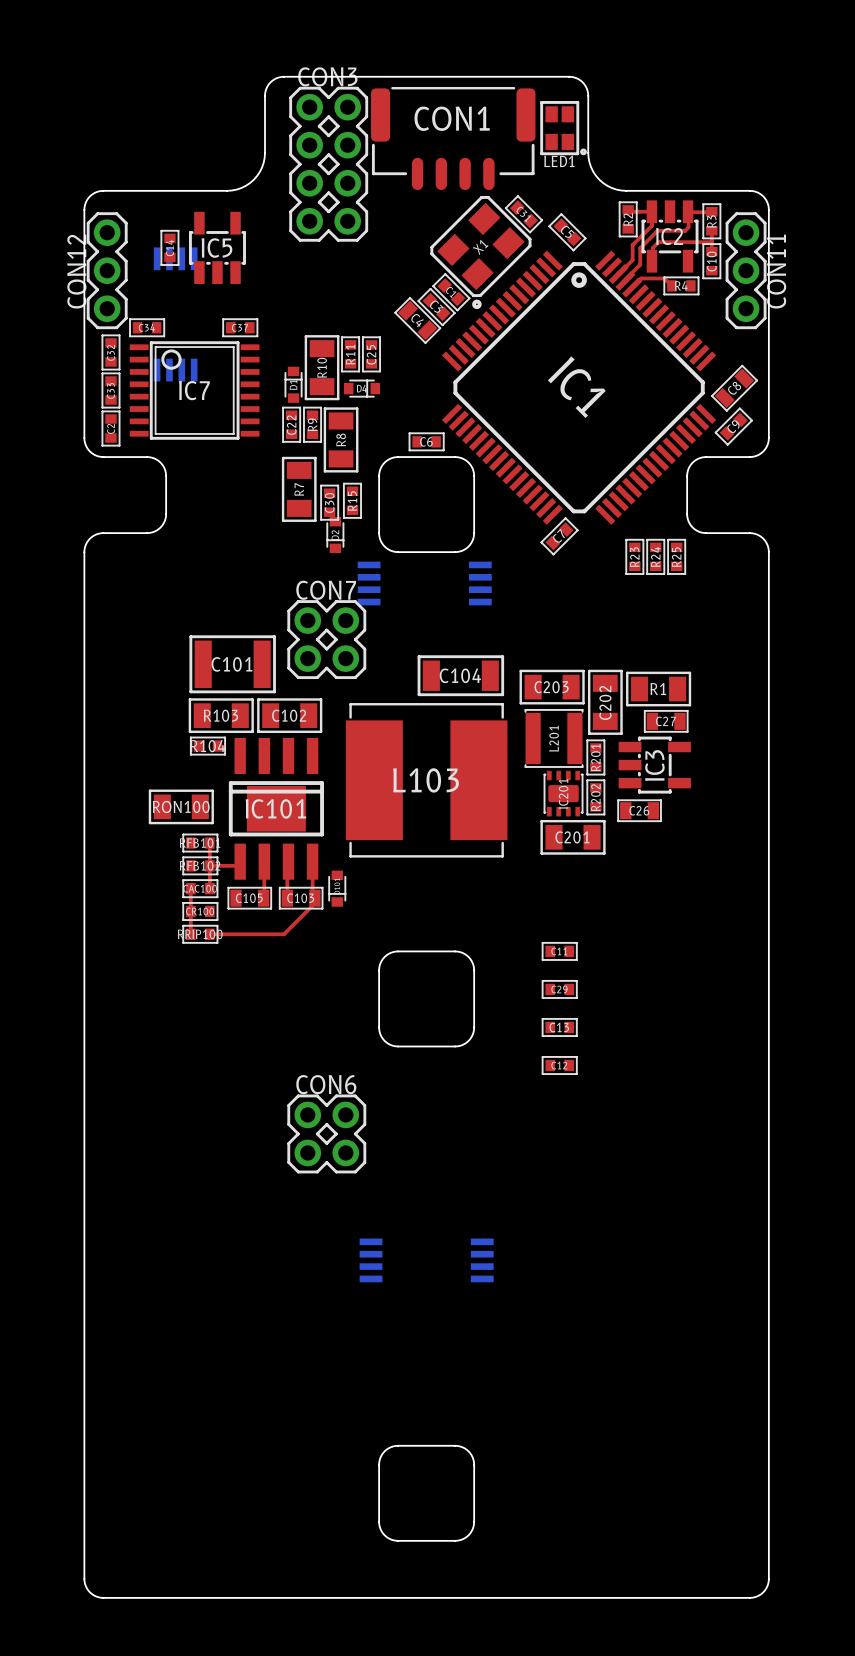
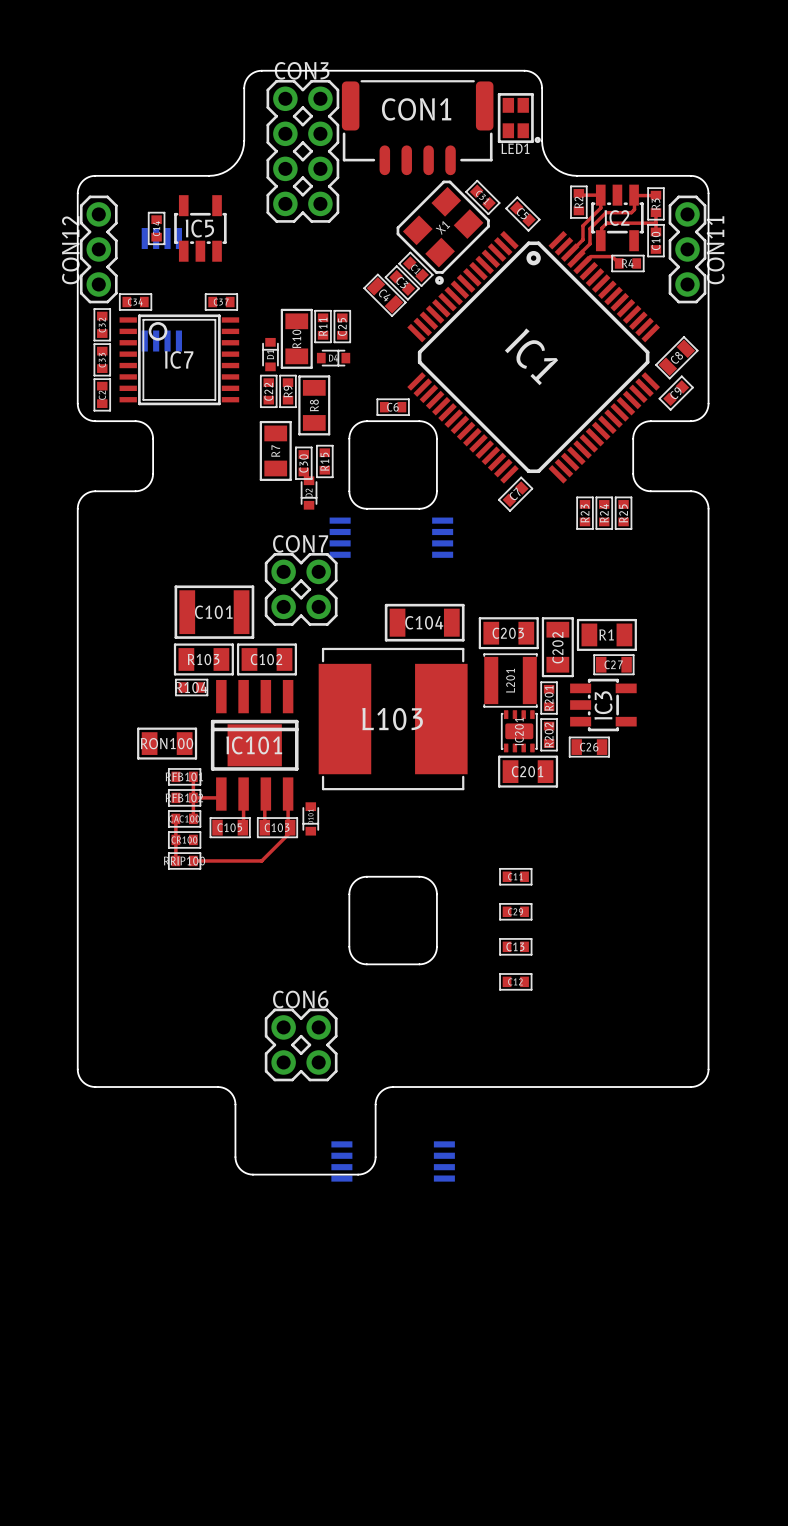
board edge: (84, 1160) (84, 1578) (89, 1592) (103, 1597) (749, 1597) (759, 1595) (766, 1588) (768, 1578) (768, 1160) -> (77, 1069) (81, 1080) (92, 1086) (217, 1087) (226, 1089) (231, 1093) (235, 1102) (236, 1161) (242, 1170) (252, 1174) (358, 1174) (366, 1172) (372, 1167) (375, 1159) (376, 1099) (380, 1092) (388, 1087) (691, 1087) (703, 1081) (708, 1069)
board edge: (398, 1445) (457, 1445) (470, 1453) (474, 1464) (474, 1521) (472, 1529) (466, 1536) (455, 1540) (398, 1540) (390, 1539) (383, 1533) (379, 1521) (379, 1462) (386, 1449) (398, 1445) -> none

